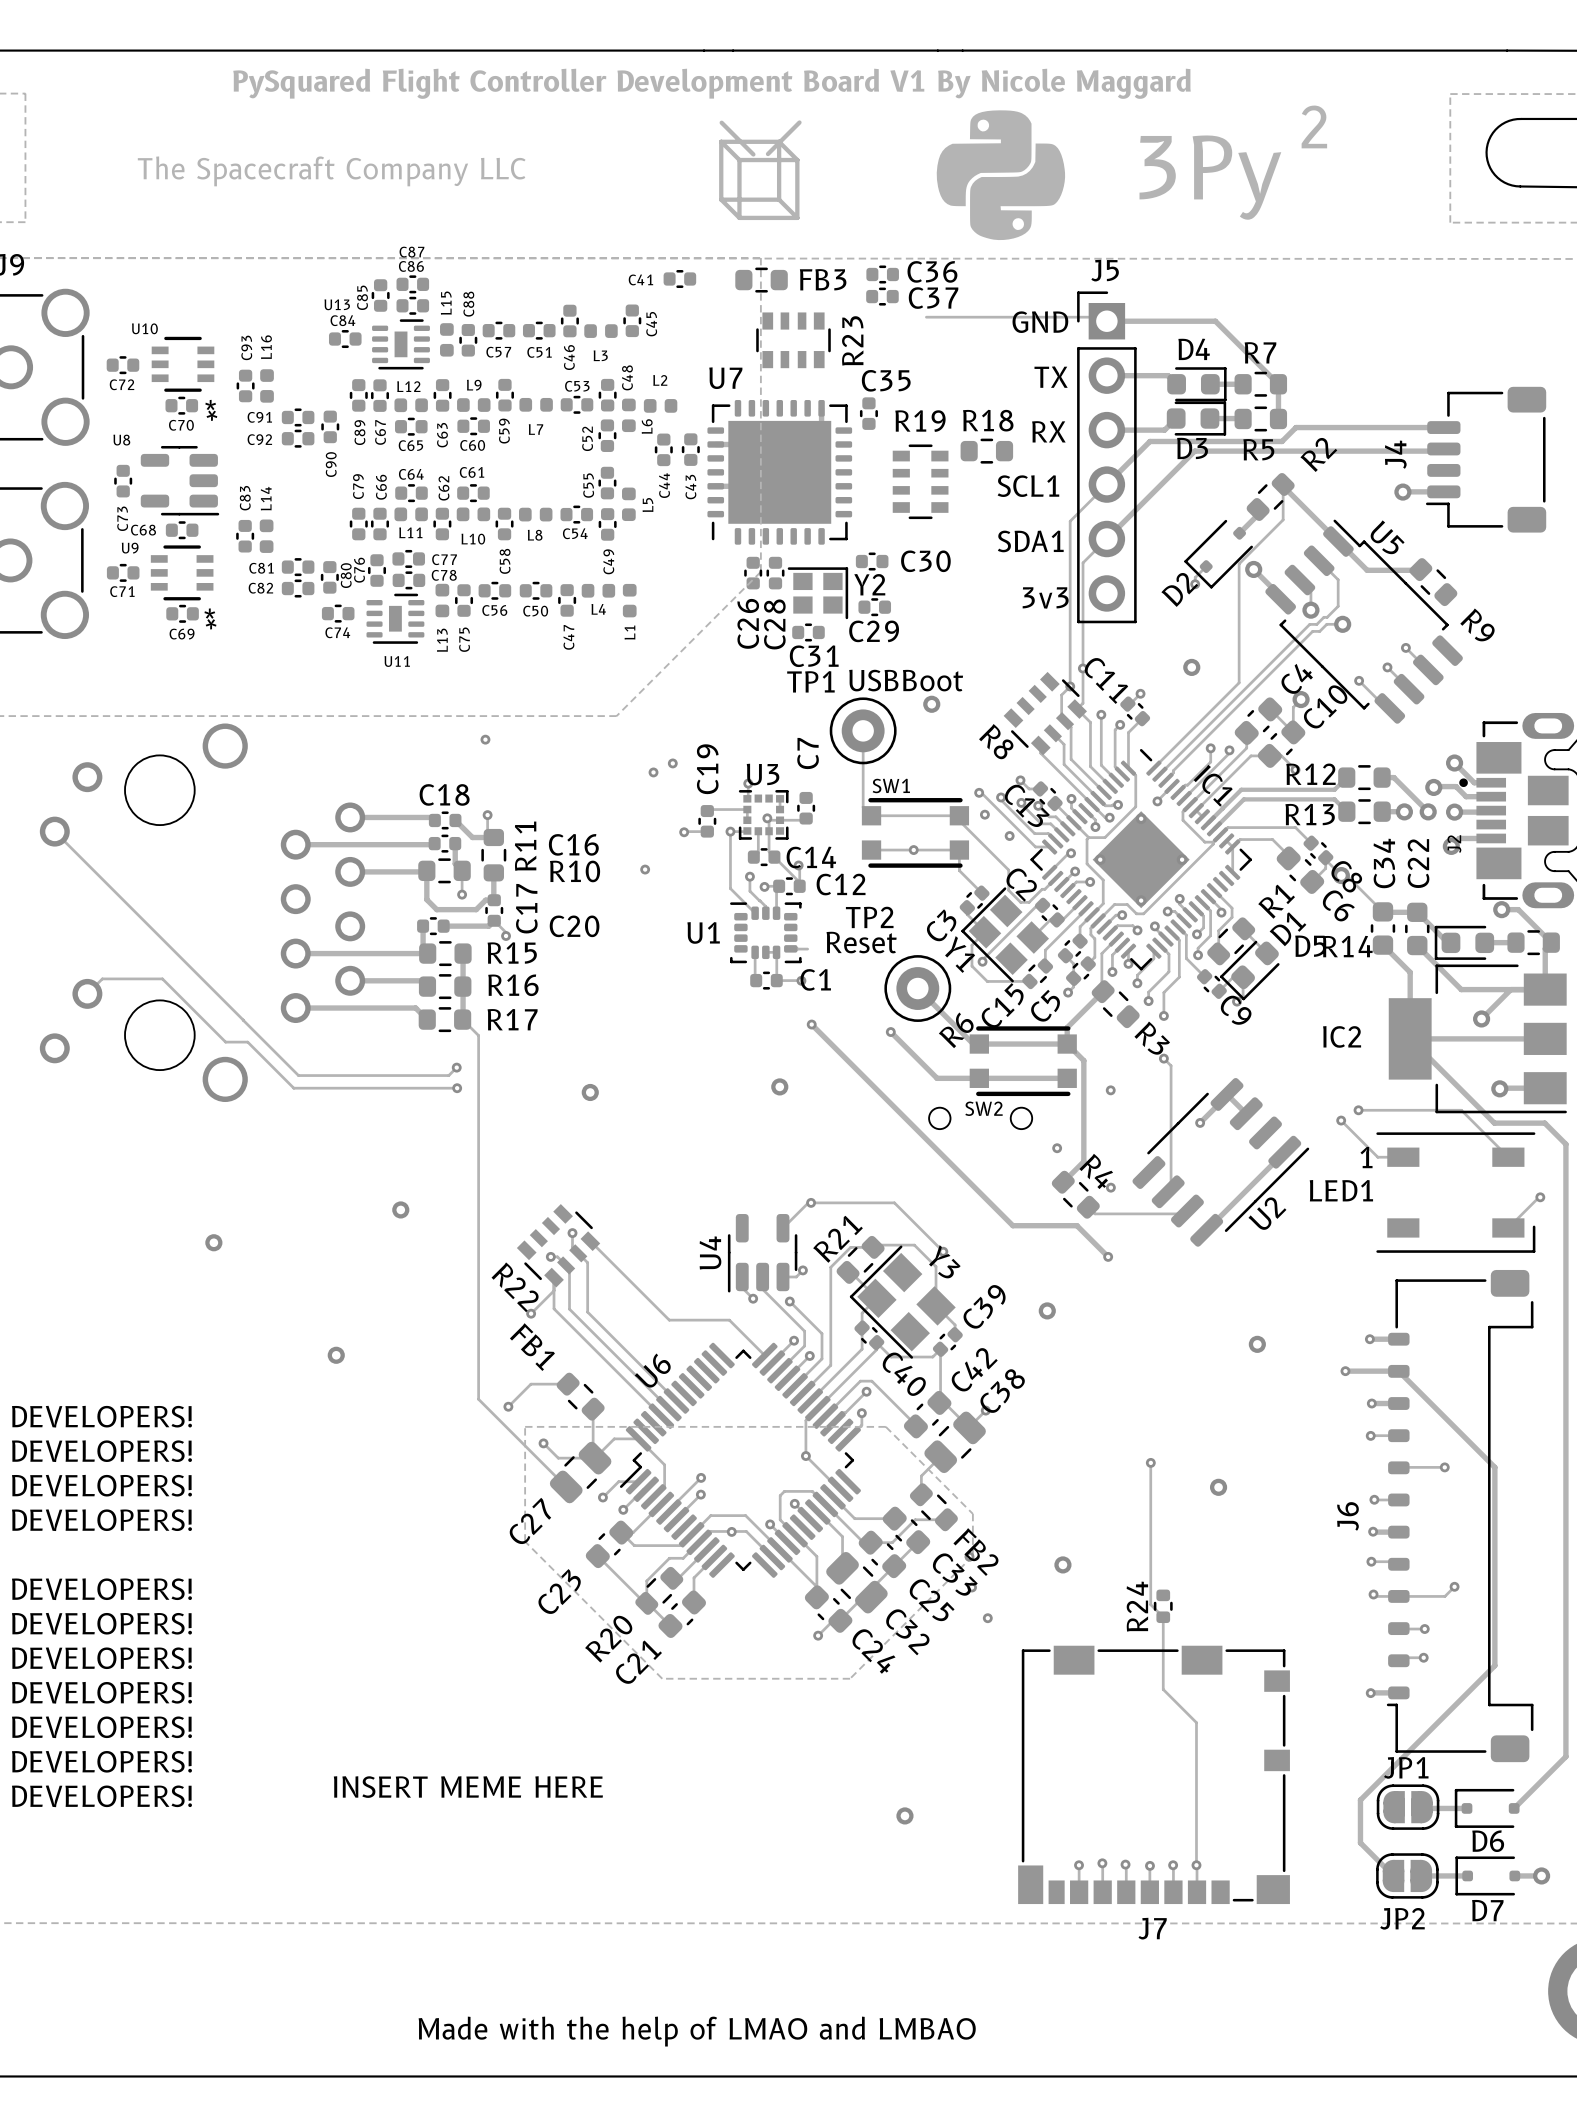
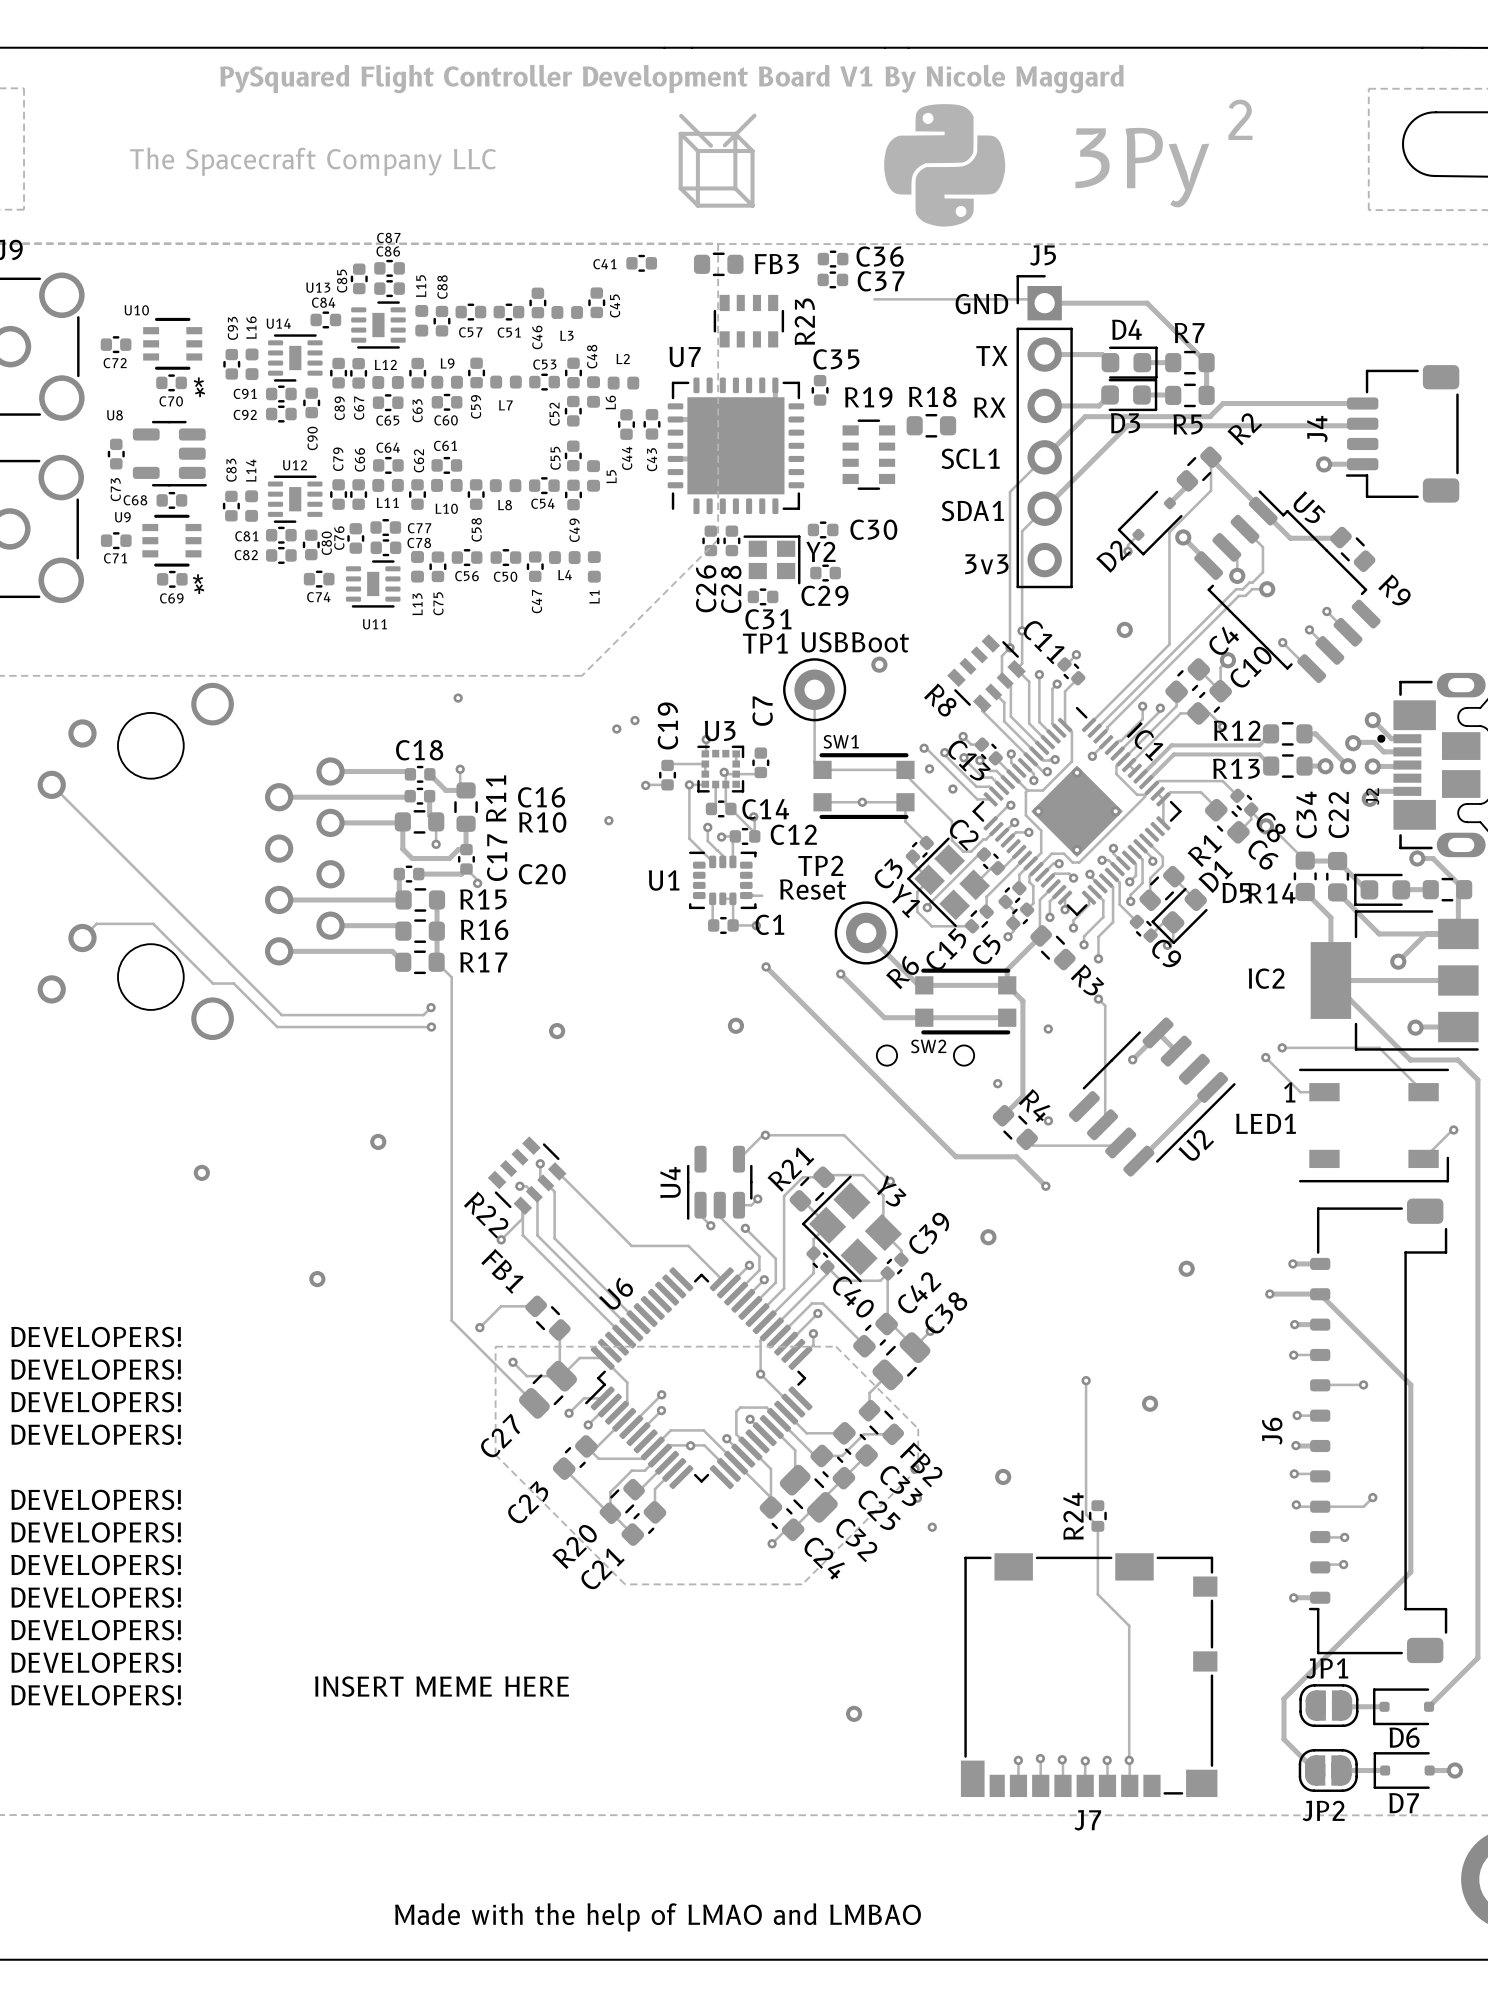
U14: none -> (295, 357)
U12: none -> (295, 499)

